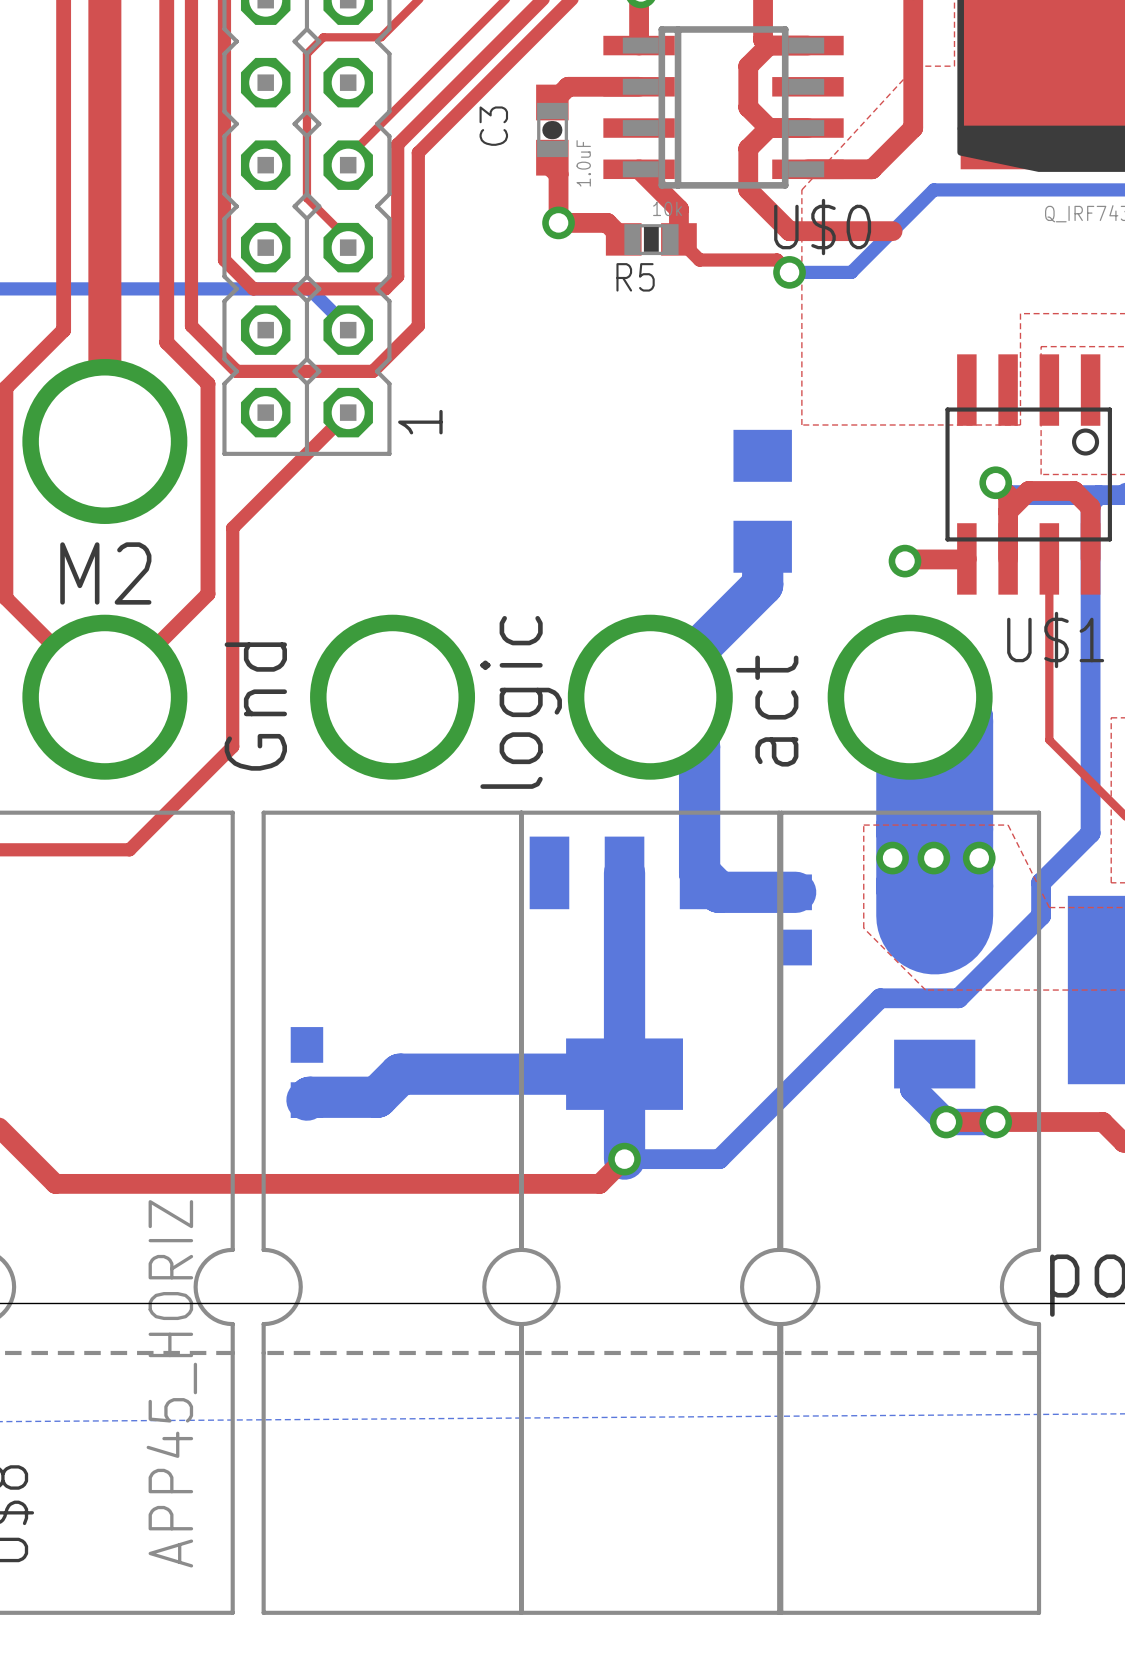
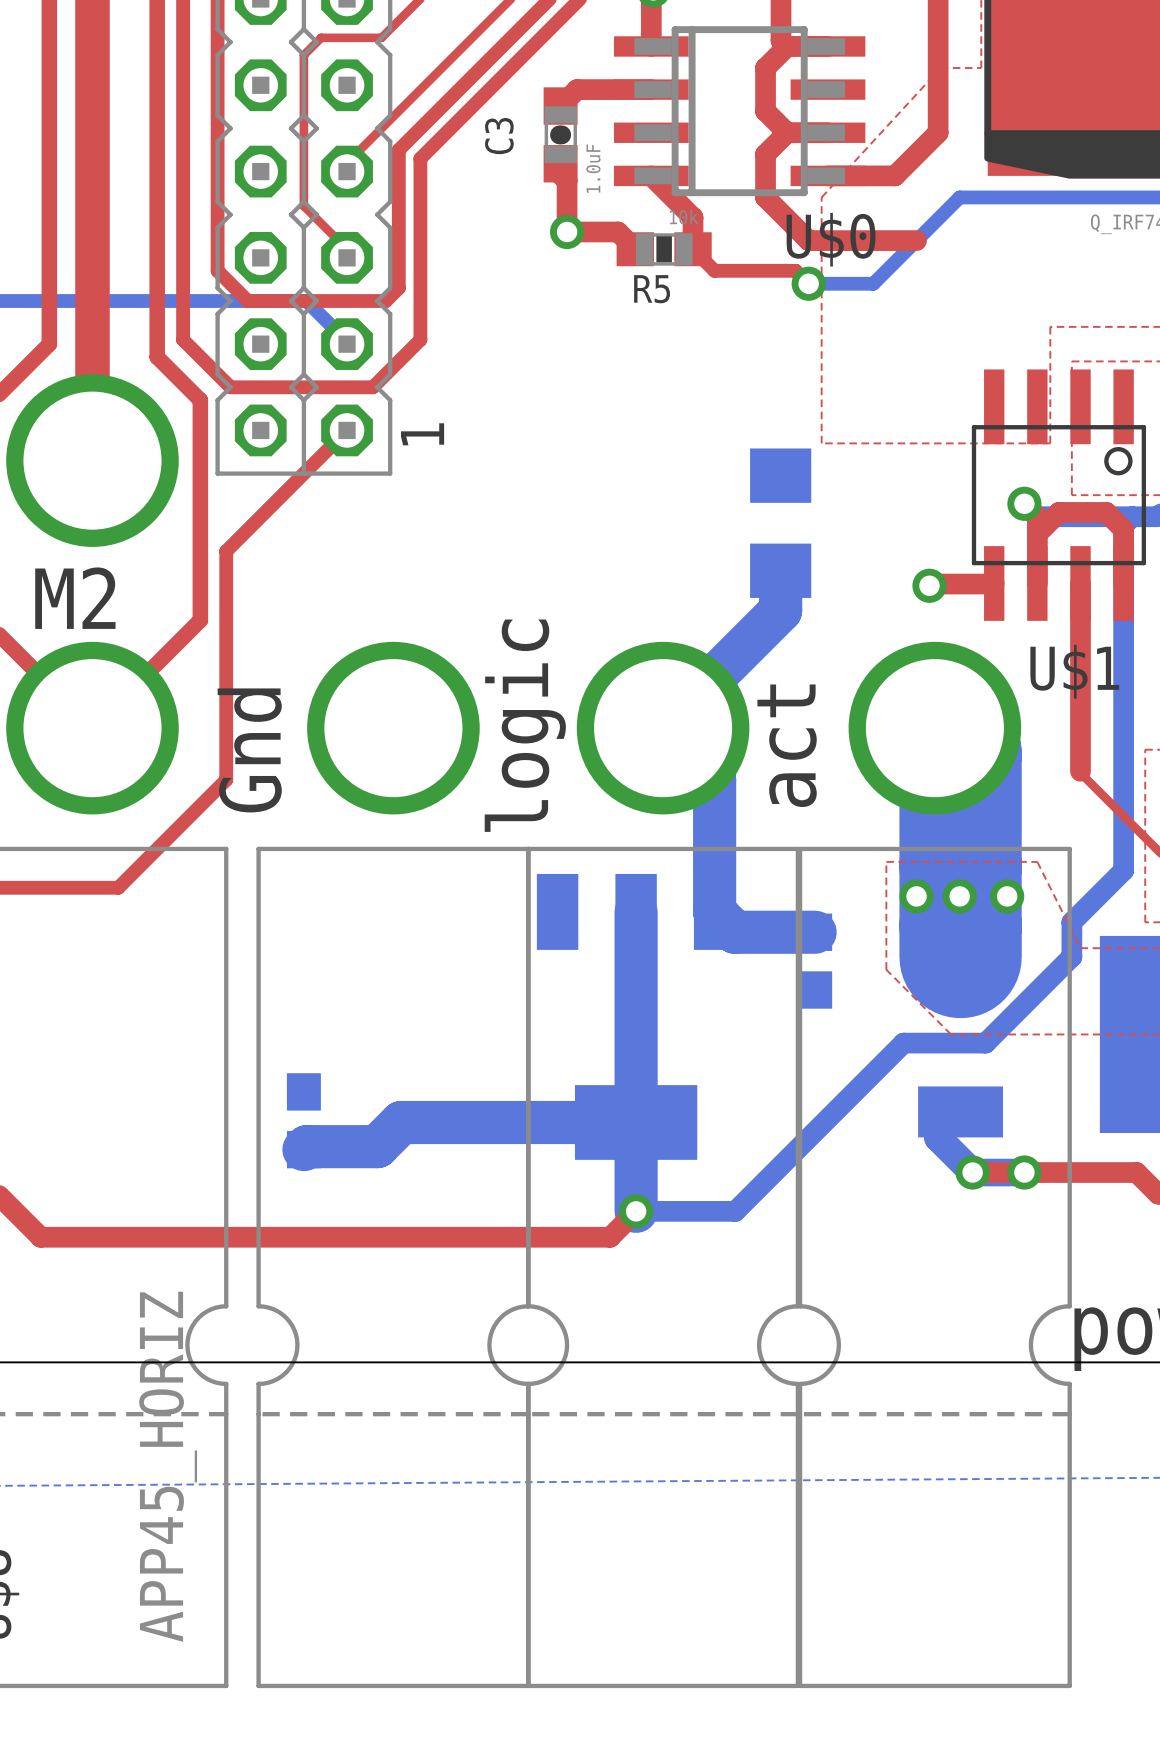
top track width: thin (1049, 558) (1049, 738) -> thick (1080, 583) (1080, 771)

